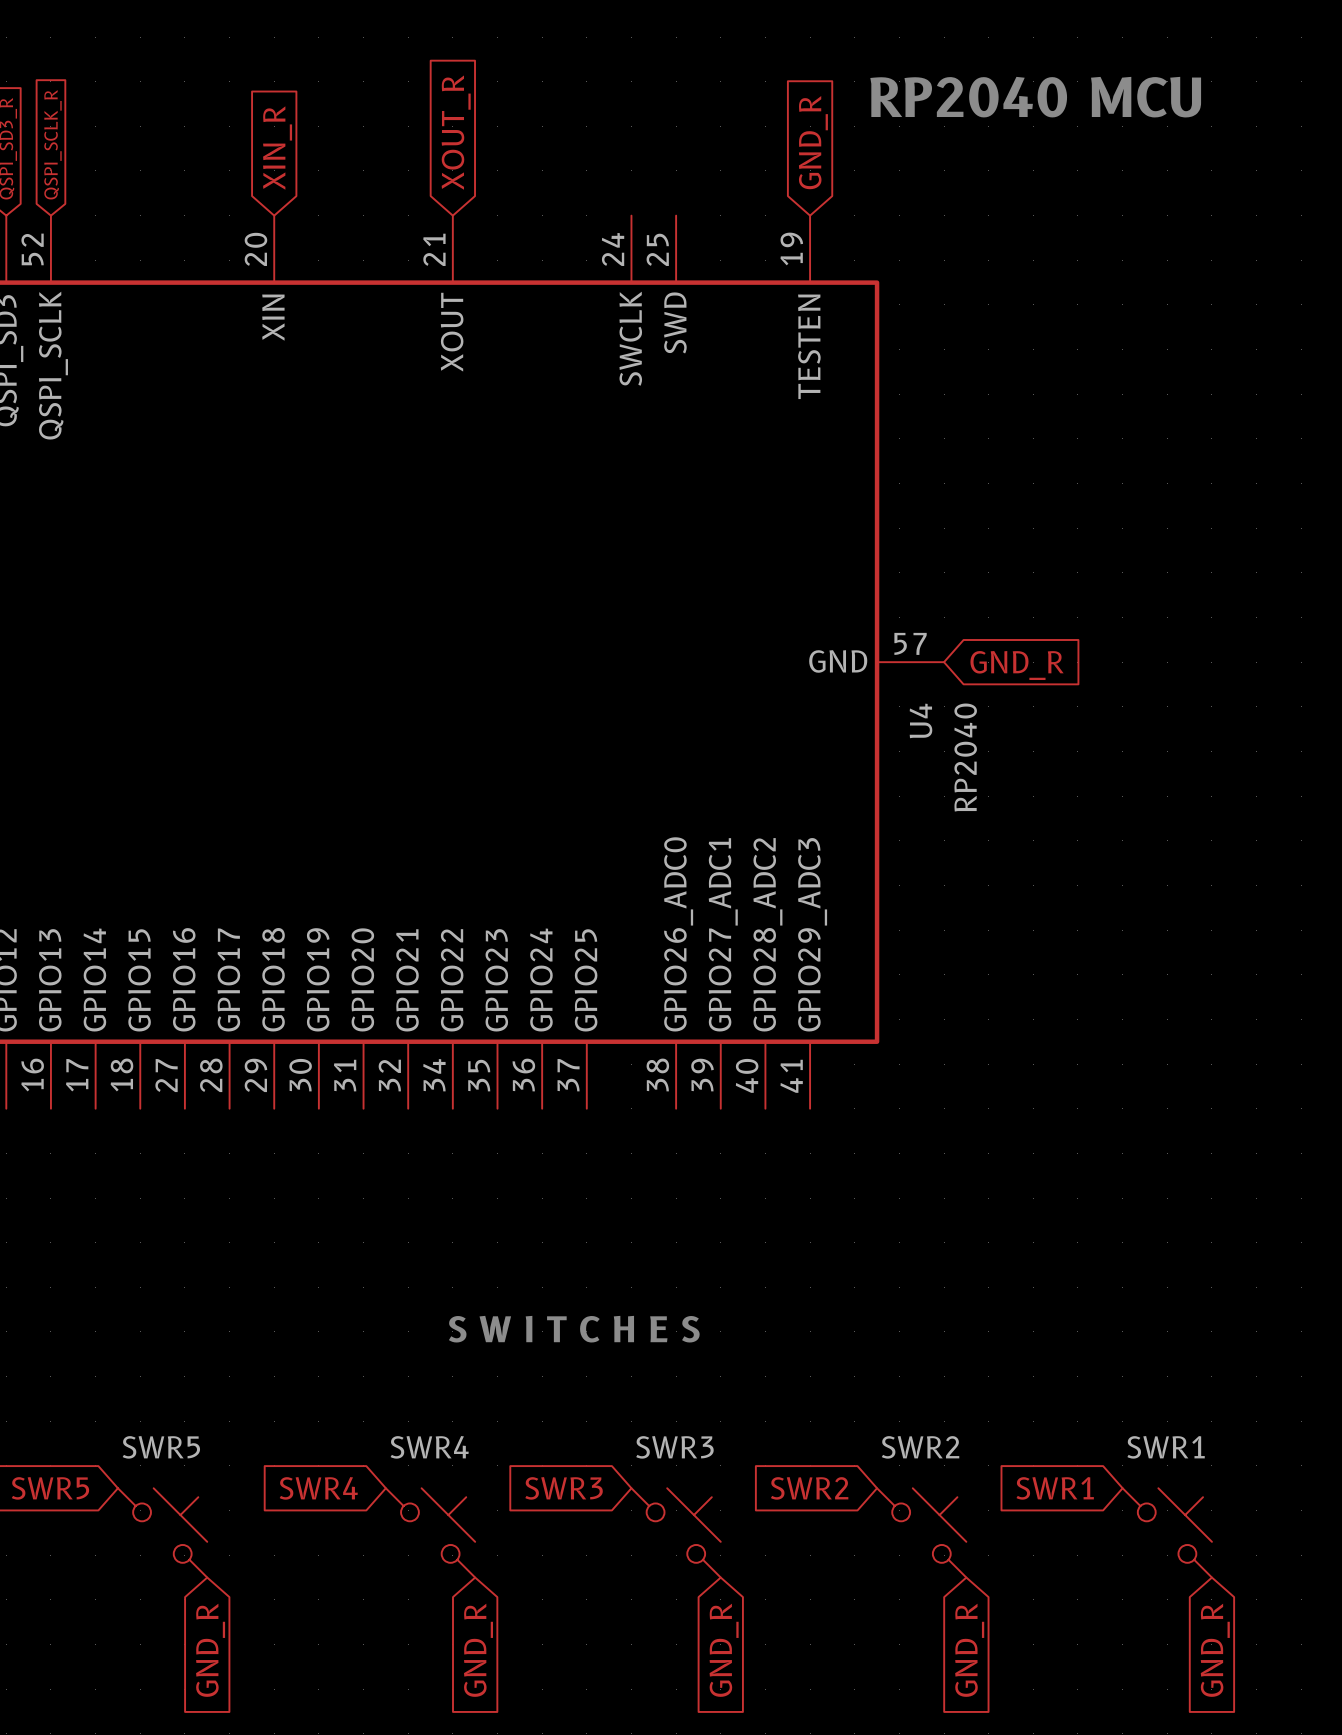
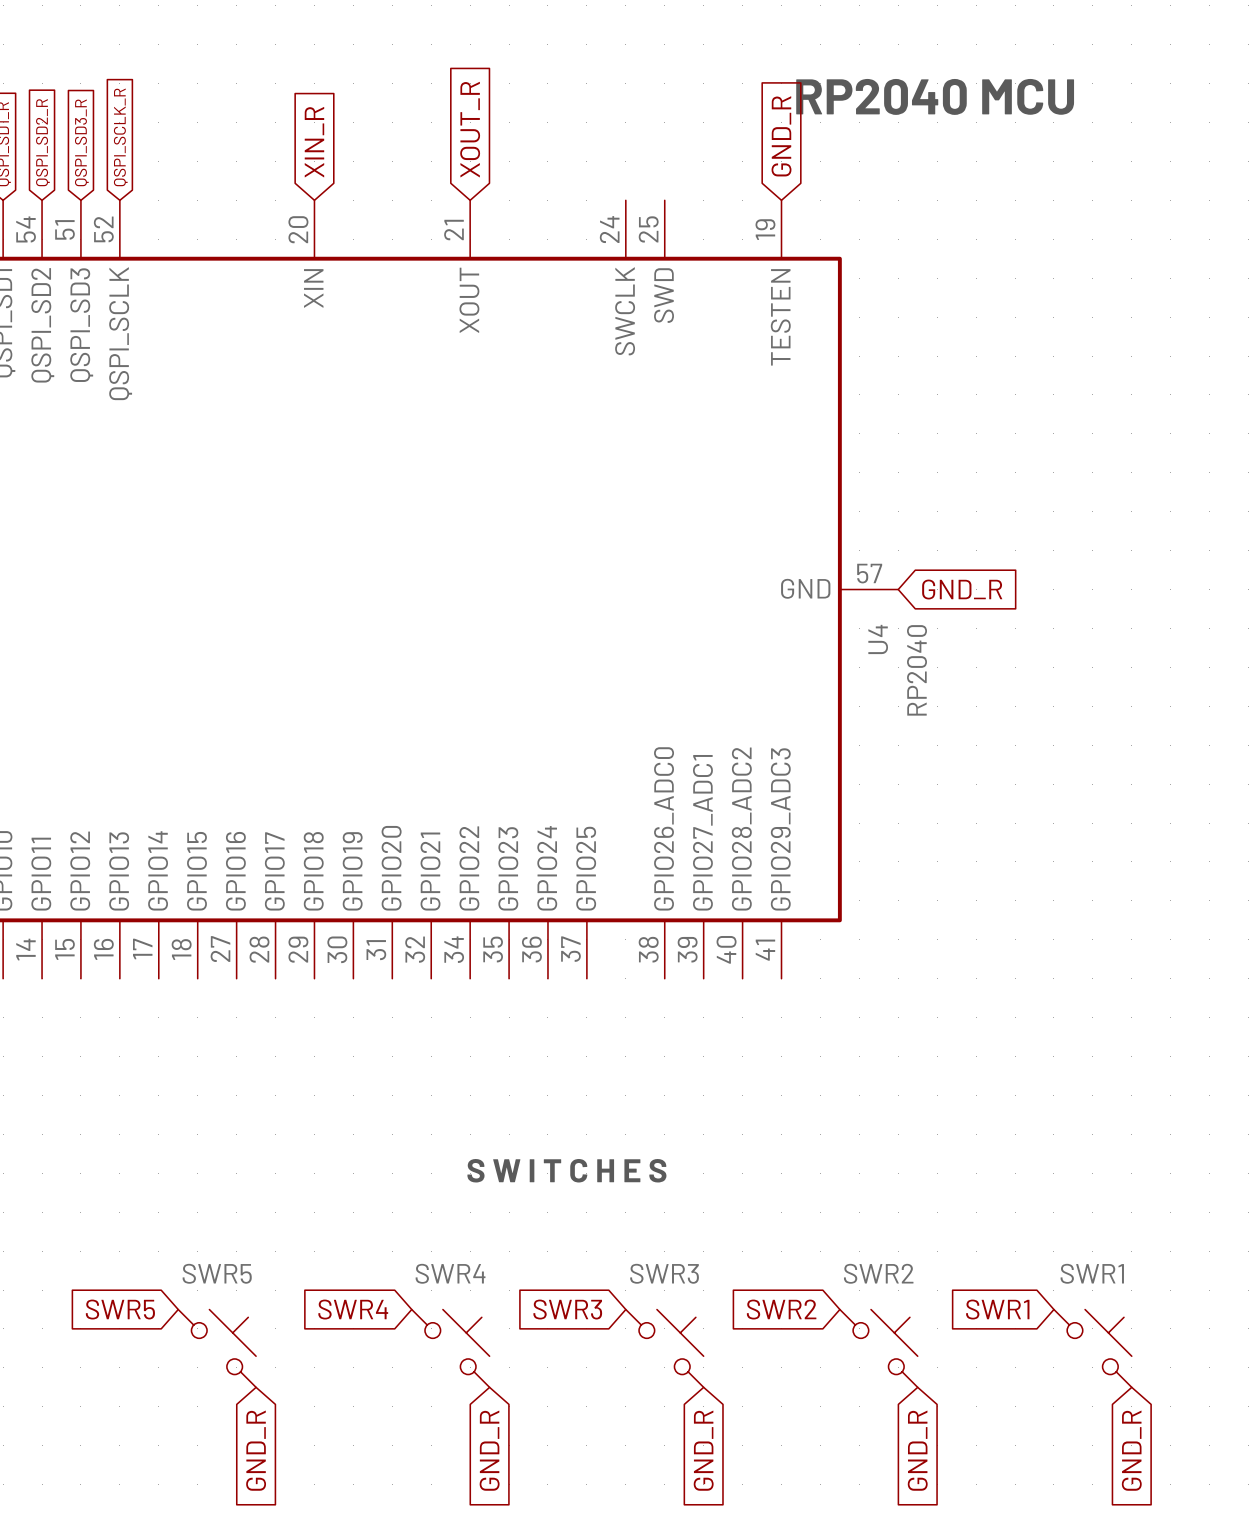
text position: RP2040 MCU (1035, 97) -> RP2040 MCU (935, 96)

